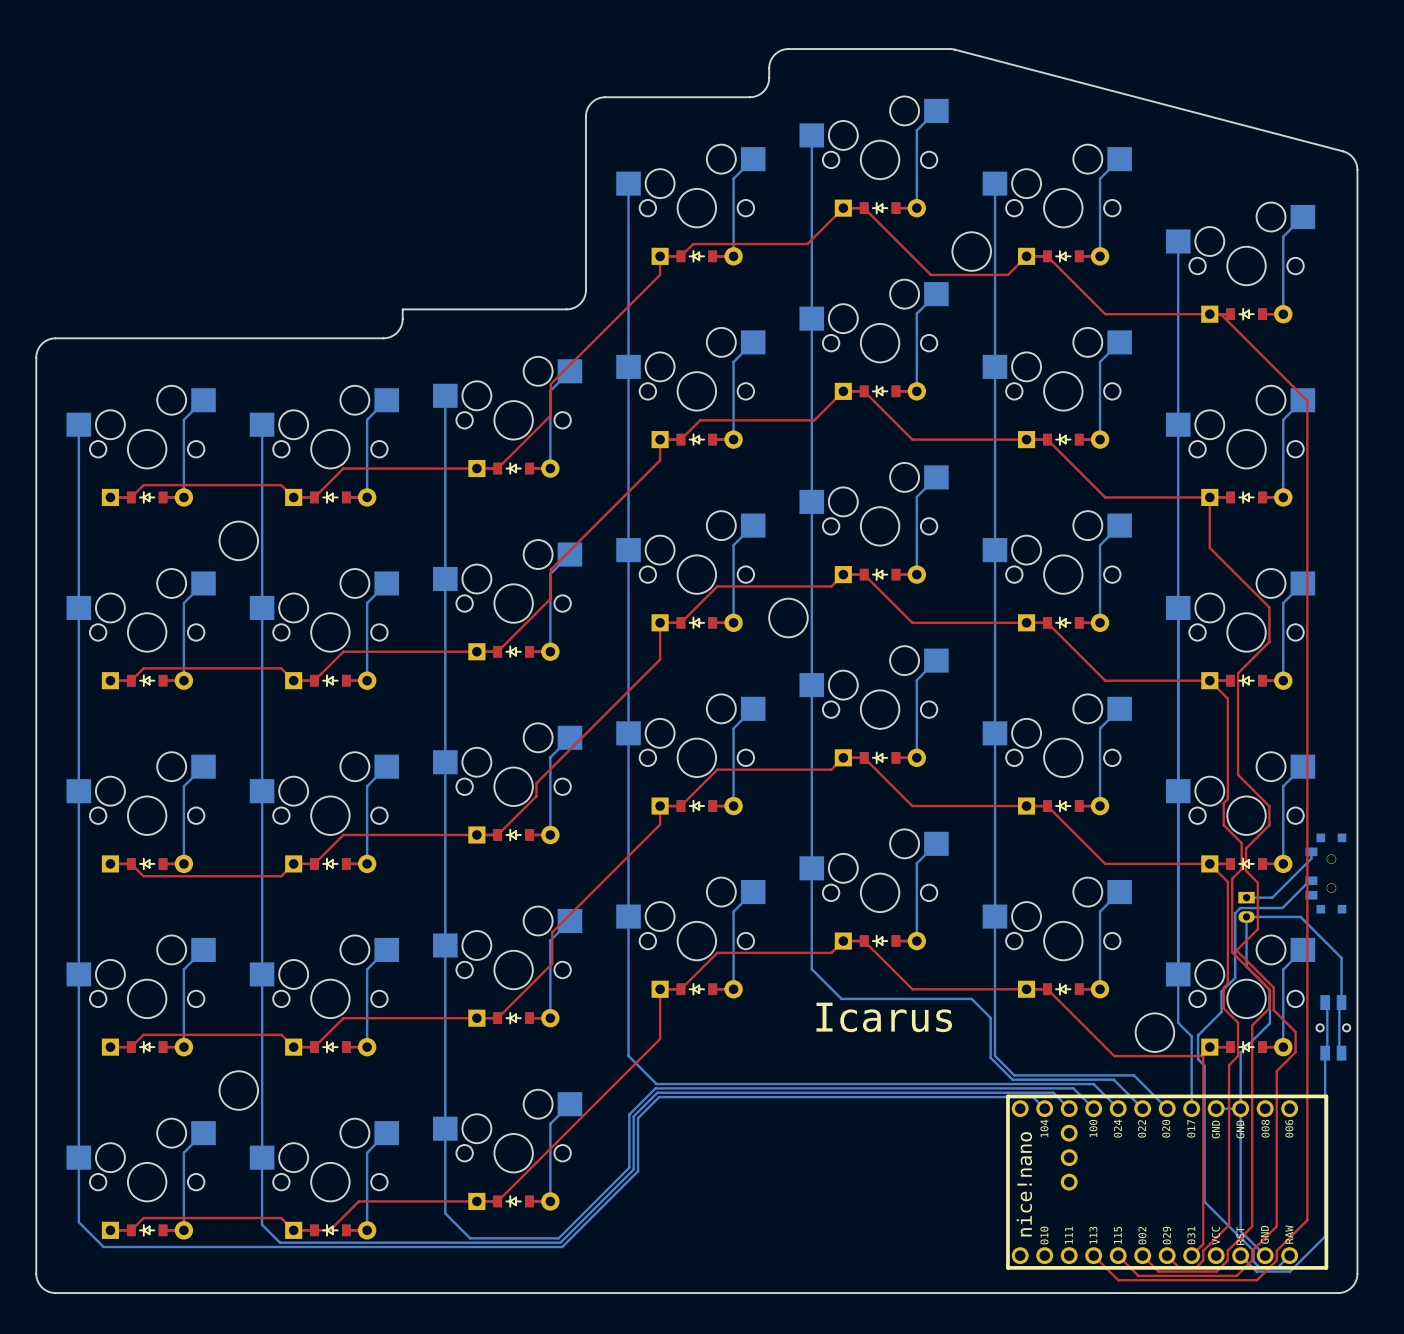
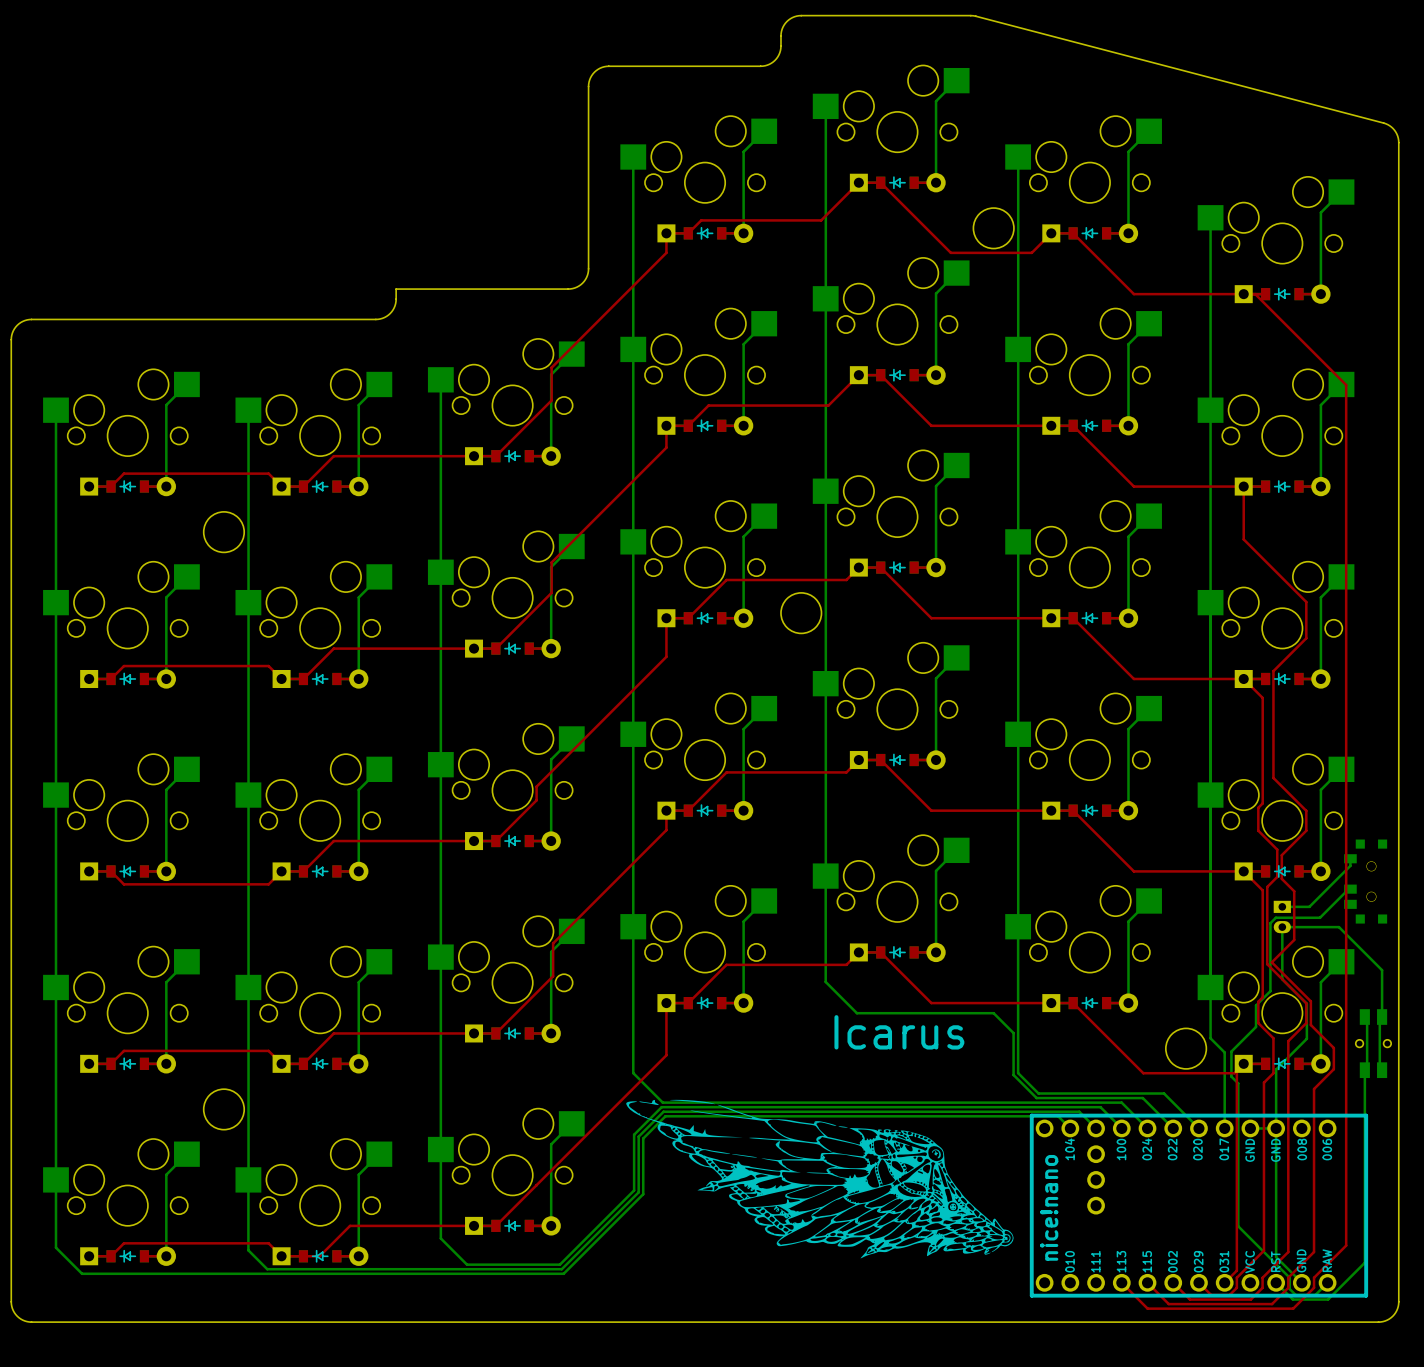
drawing: none -> [626, 1099, 1014, 1259]

